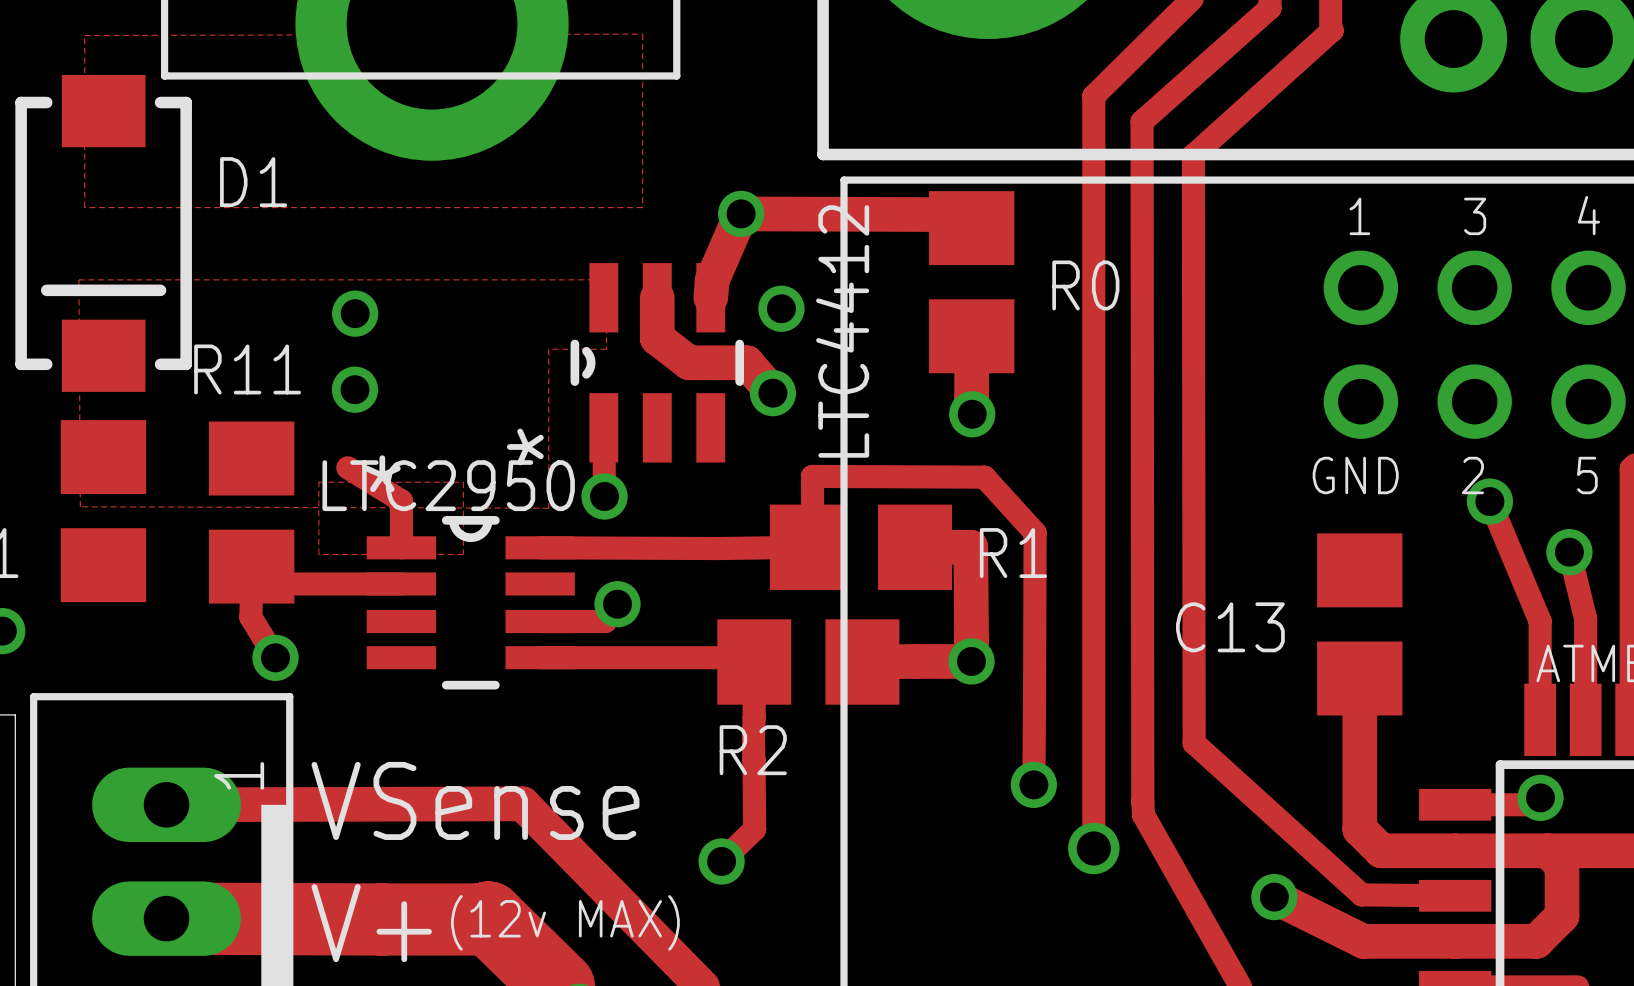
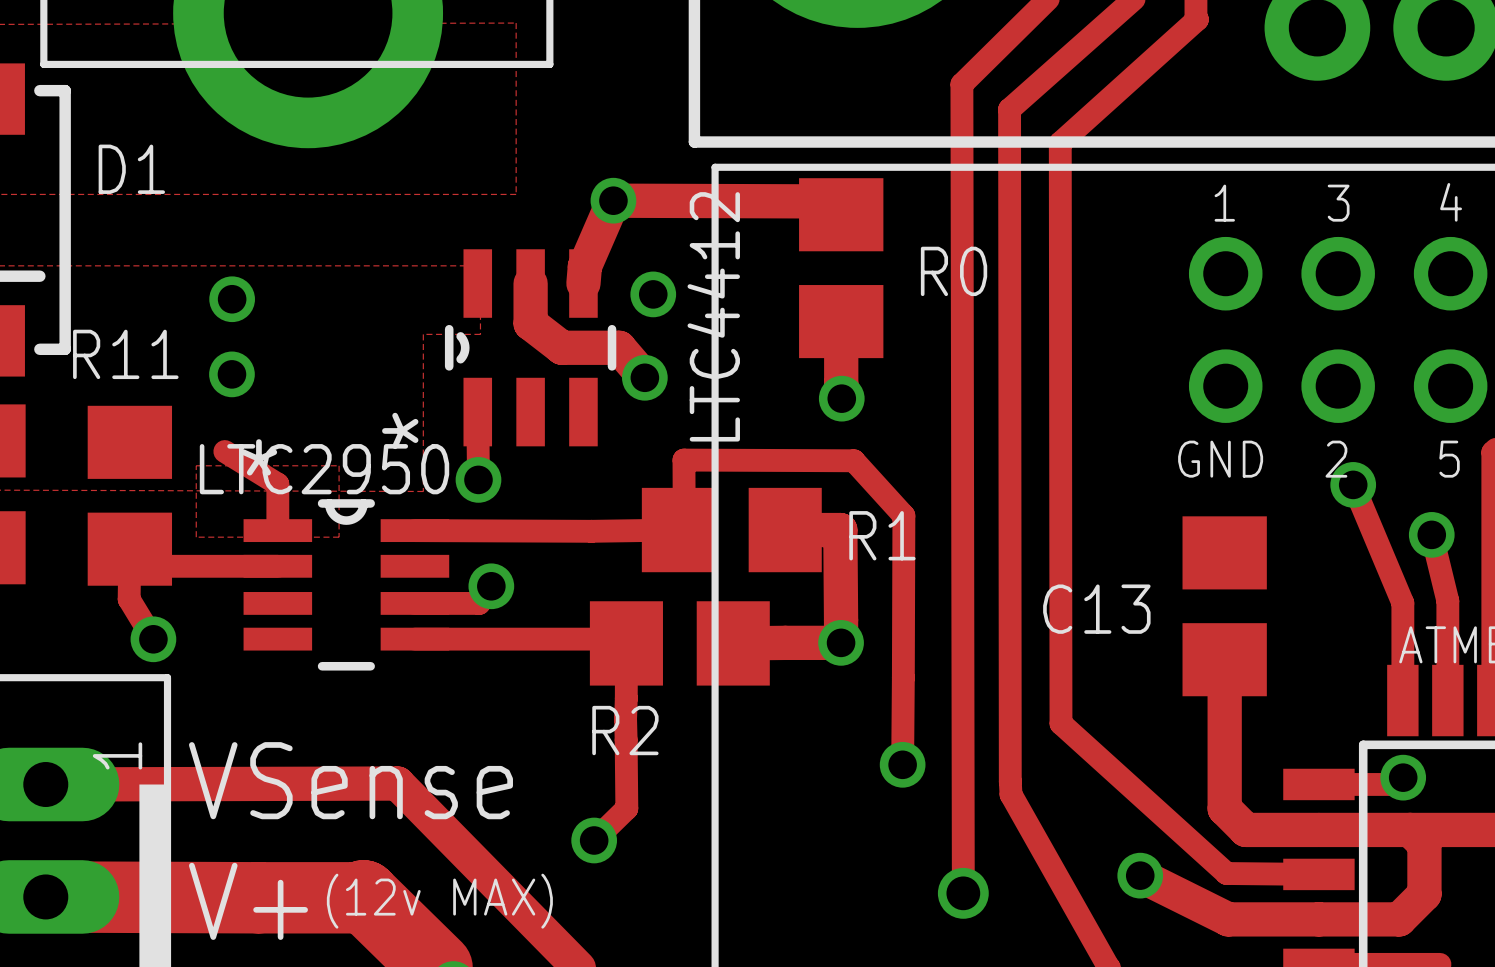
track: (1093, 96) (1093, 848) -> (961, 84) (963, 893)
via position: (1093, 848) -> (963, 893)

